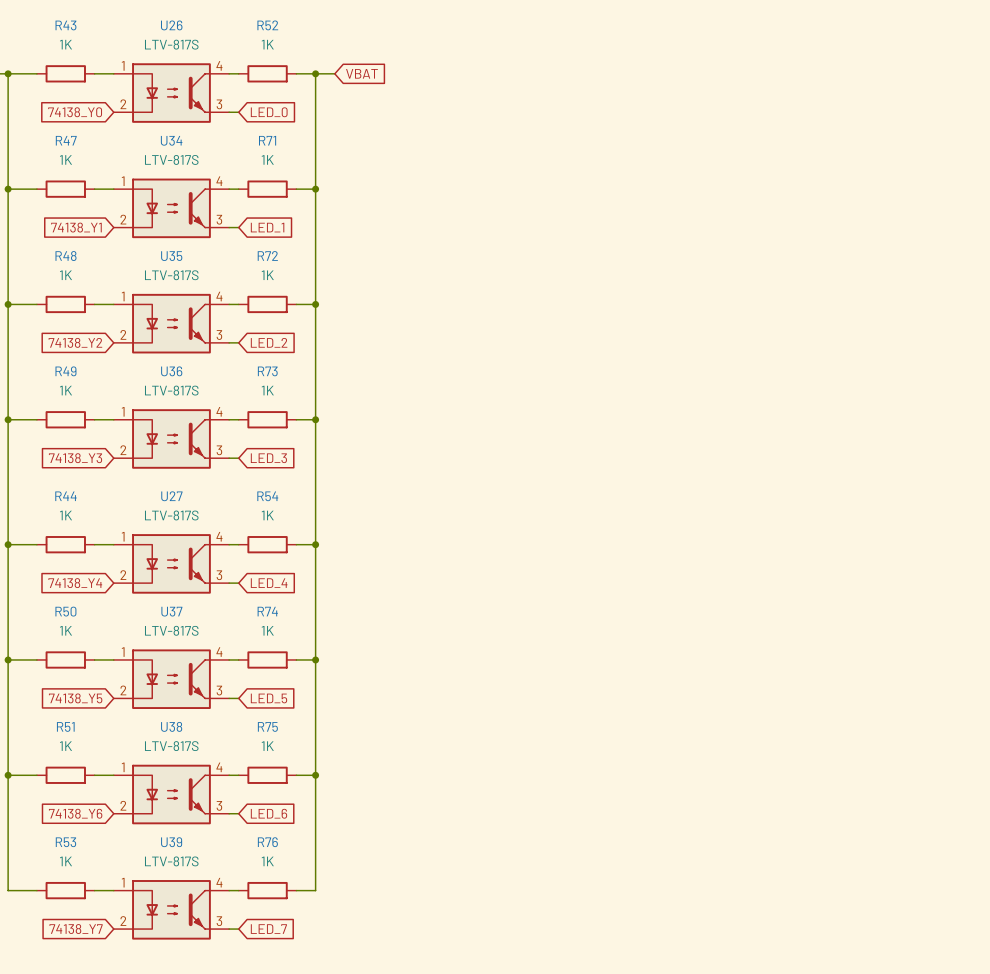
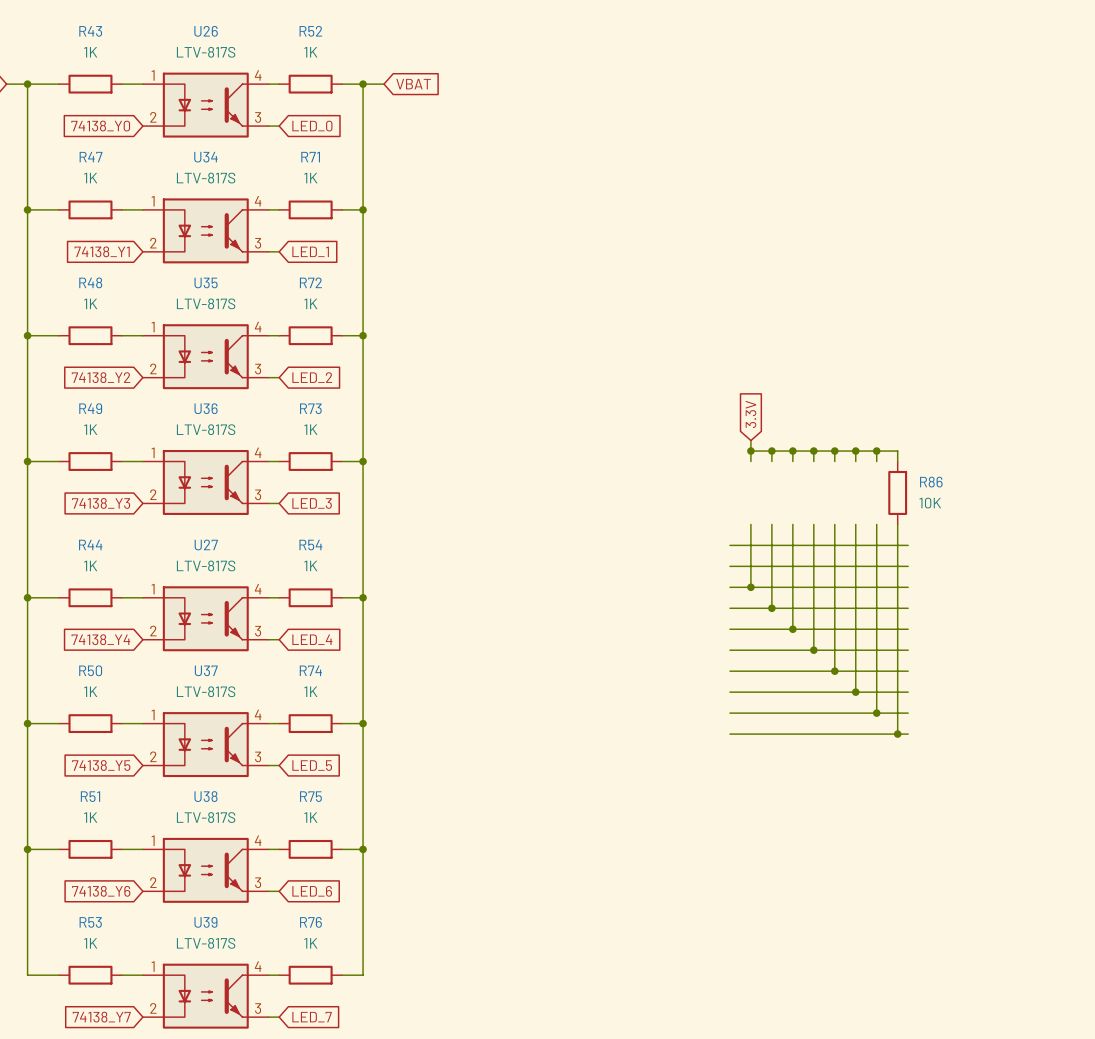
global label: none -> 3.3V (750, 414)
wire: none -> (750, 440) (750, 461)
wire: none -> (750, 451) (897, 451) (897, 461)
junction: none -> (750, 451)
wire: none -> (771, 451) (771, 461)
junction: none -> (771, 451)
wire: none -> (792, 451) (792, 461)
junction: none -> (792, 451)
wire: none -> (813, 451) (813, 461)
junction: none -> (813, 451)
wire: none -> (834, 451) (834, 461)
junction: none -> (834, 451)
wire: none -> (855, 451) (855, 461)
junction: none -> (855, 451)
wire: none -> (876, 451) (876, 461)
junction: none -> (876, 451)
R86: none -> 10K (897, 492)
wire: none -> (750, 524) (750, 587)
wire: none -> (771, 524) (771, 608)
wire: none -> (792, 524) (792, 629)
wire: none -> (813, 524) (813, 650)
wire: none -> (834, 524) (834, 671)
wire: none -> (855, 524) (855, 692)
wire: none -> (876, 524) (876, 713)
wire: none -> (897, 524) (897, 734)
wire: none -> (729, 545) (908, 545)
wire: none -> (729, 566) (908, 566)
wire: none -> (729, 587) (908, 587)
junction: none -> (750, 587)
wire: none -> (729, 608) (908, 608)
junction: none -> (771, 608)
wire: none -> (729, 629) (908, 629)
junction: none -> (792, 629)
wire: none -> (729, 650) (908, 650)
junction: none -> (813, 650)
wire: none -> (729, 671) (908, 671)
junction: none -> (834, 671)
wire: none -> (729, 692) (908, 692)
junction: none -> (855, 692)
wire: none -> (729, 713) (908, 713)
junction: none -> (876, 713)
wire: none -> (729, 734) (908, 734)
junction: none -> (897, 734)

